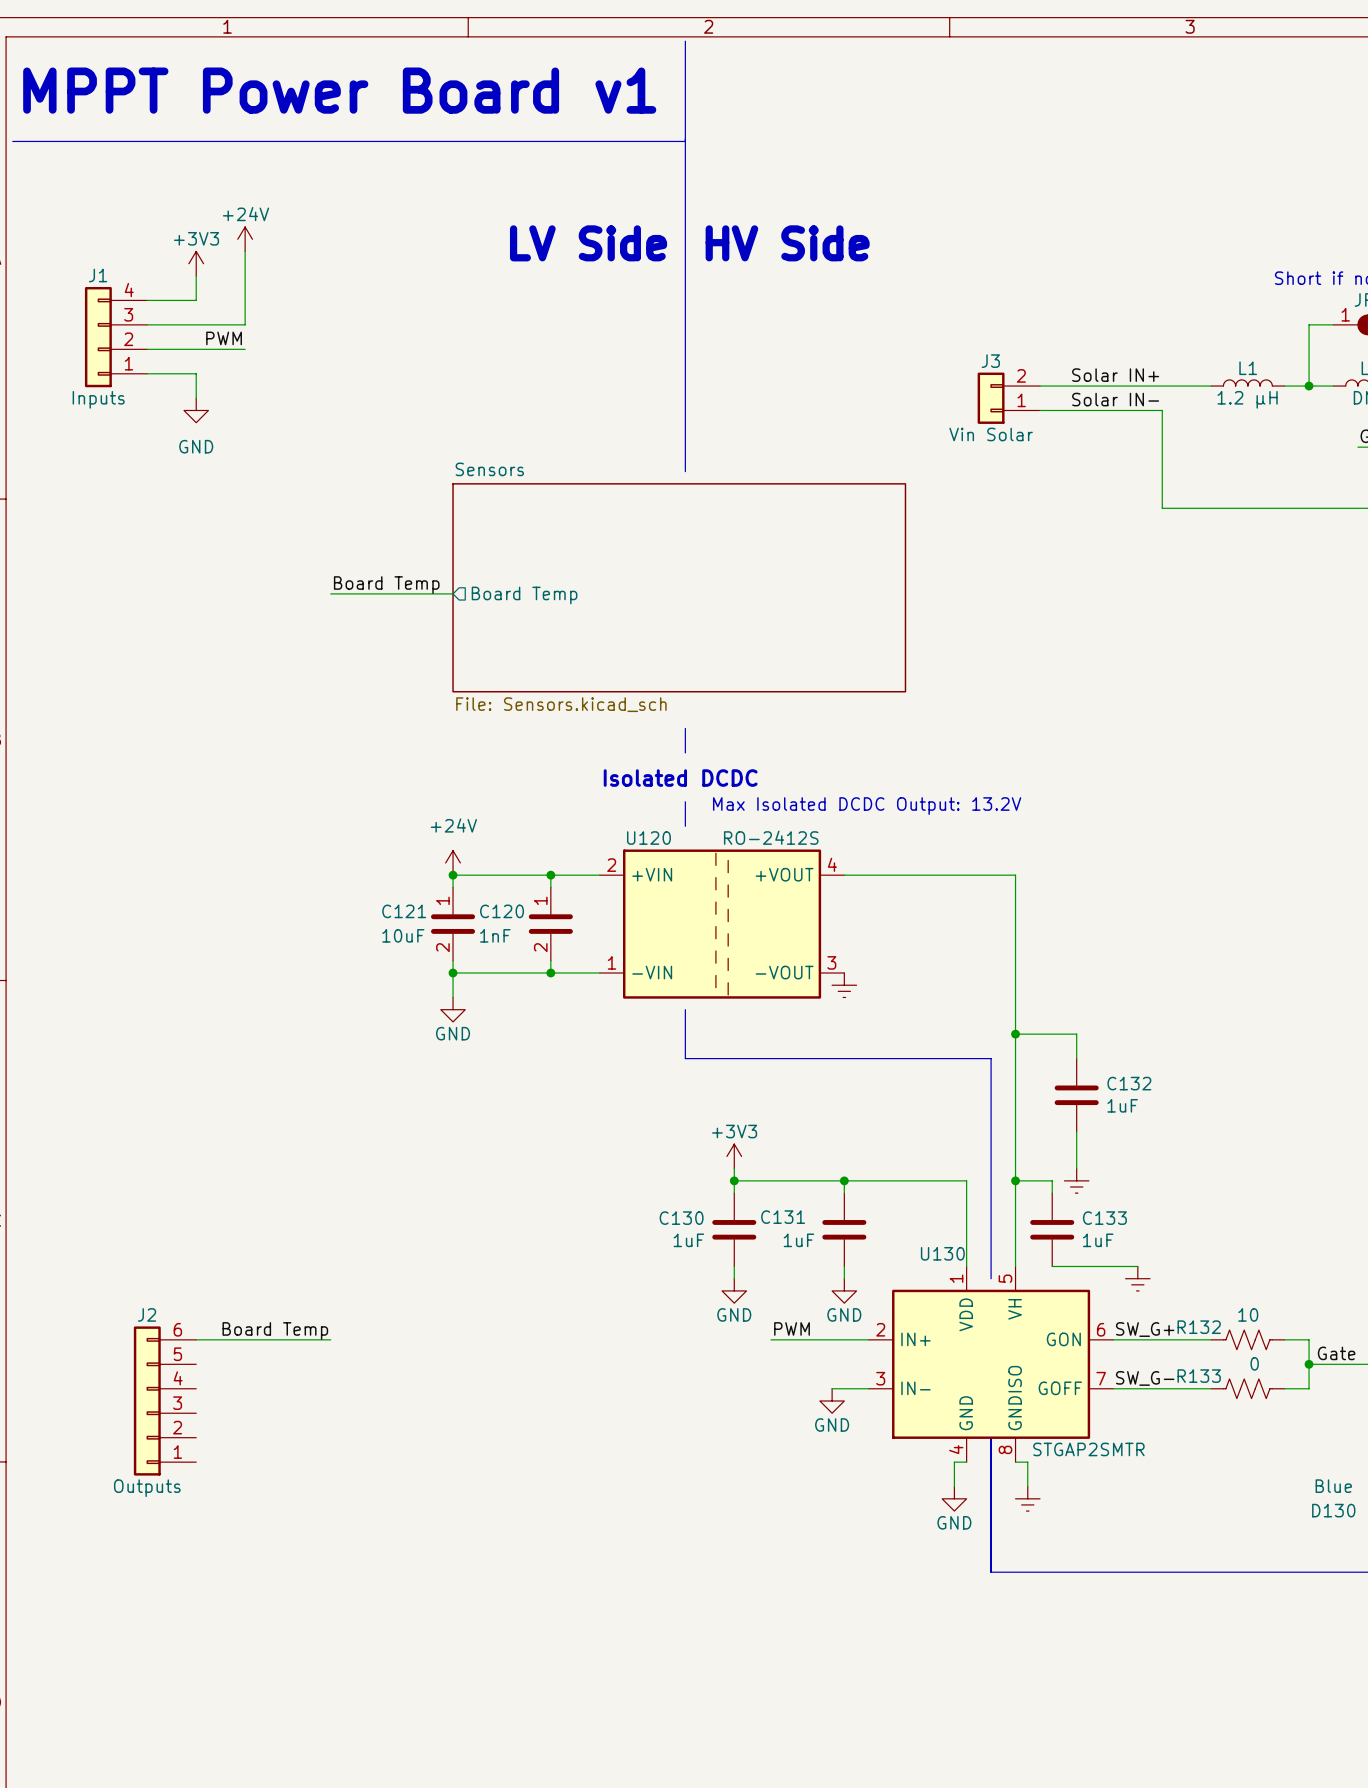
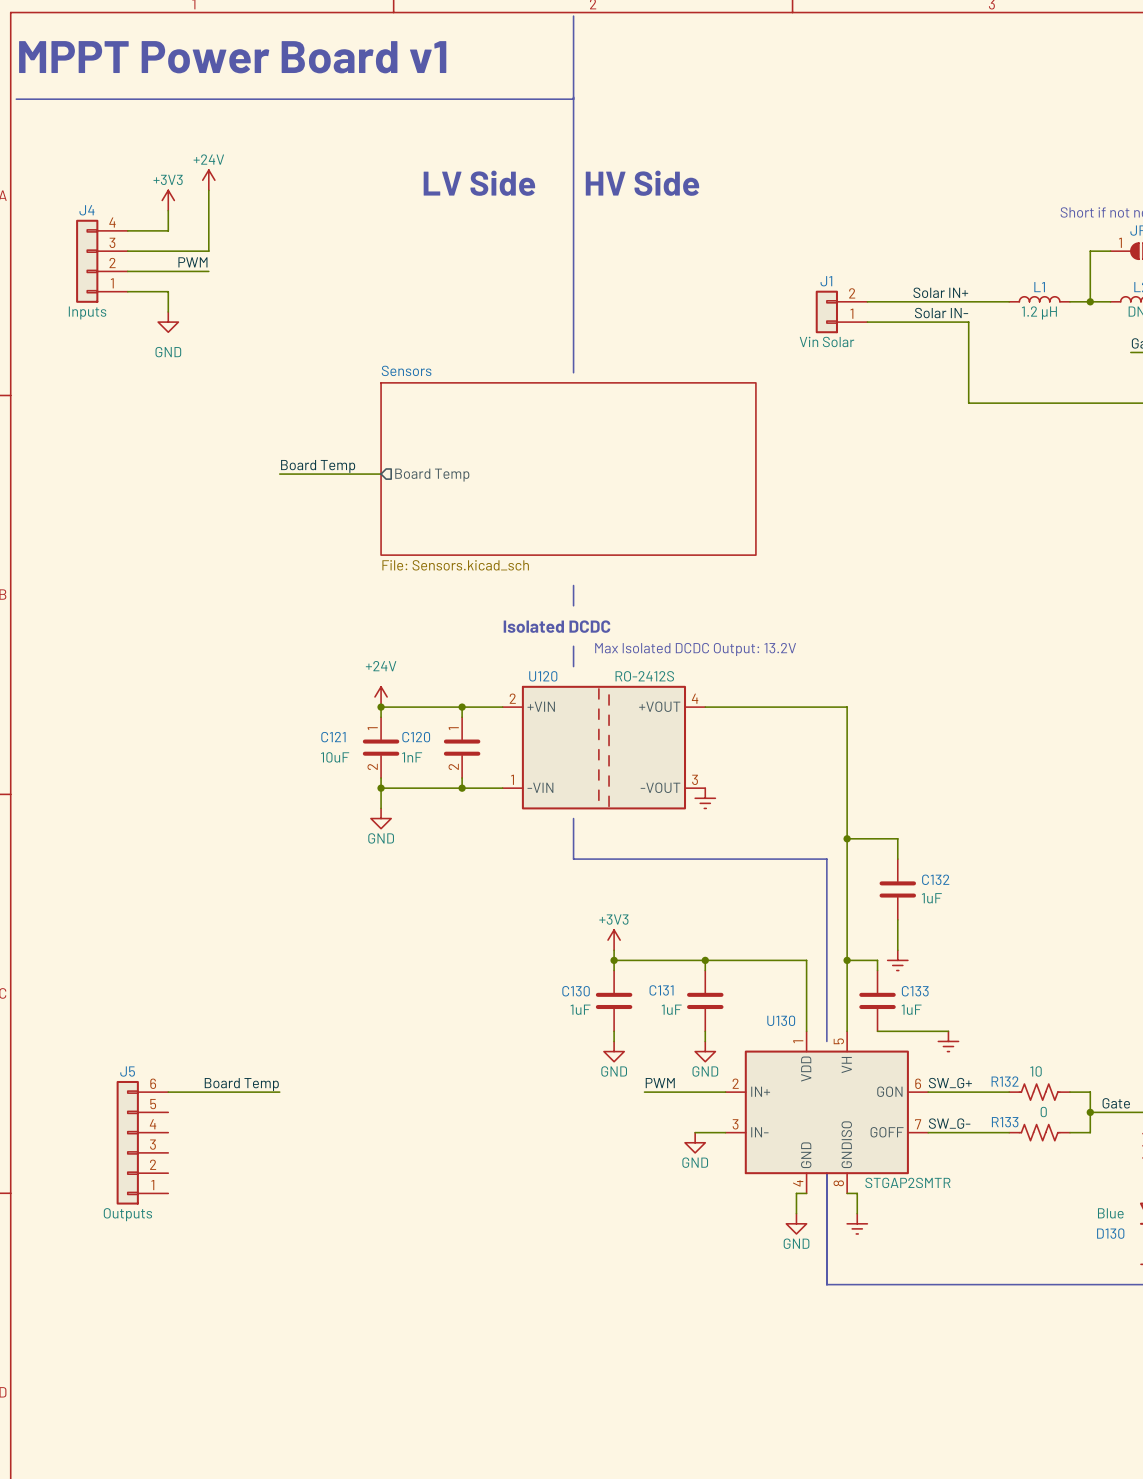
J1 name: J1 (98, 275) -> J4 (86, 210)
J3 name: J3 (990, 361) -> J1 (826, 281)
J2 name: J2 (147, 1314) -> J5 (127, 1071)

